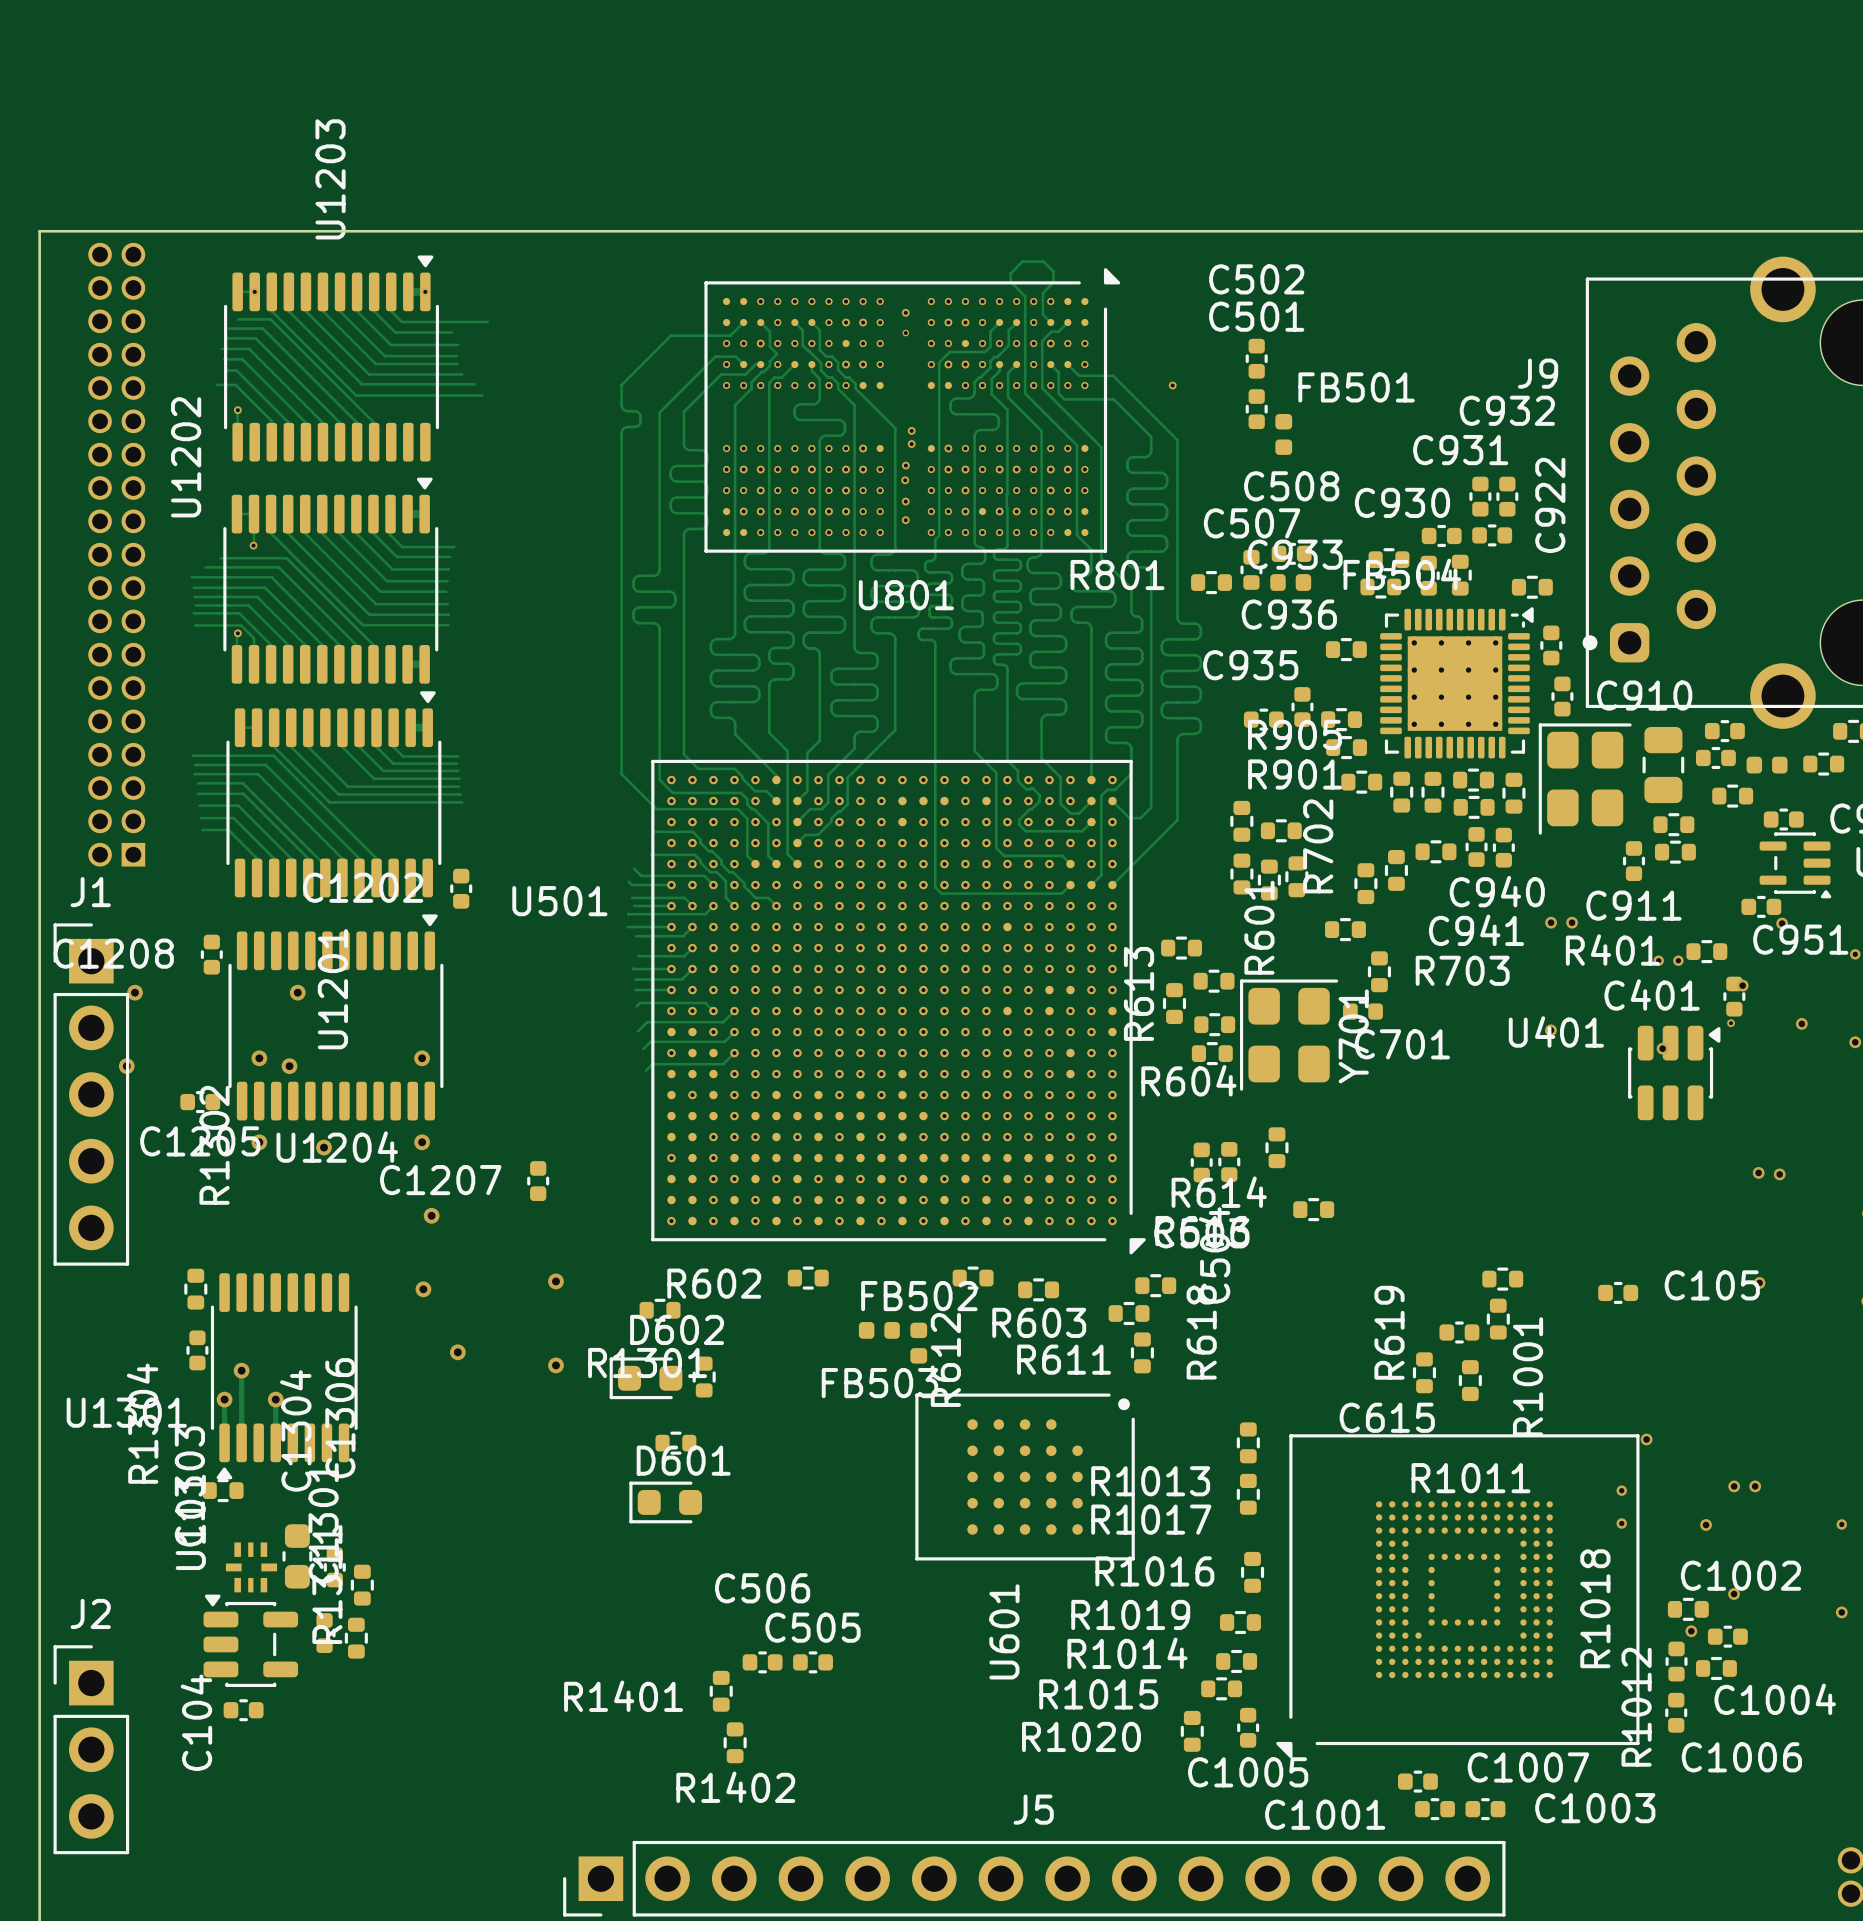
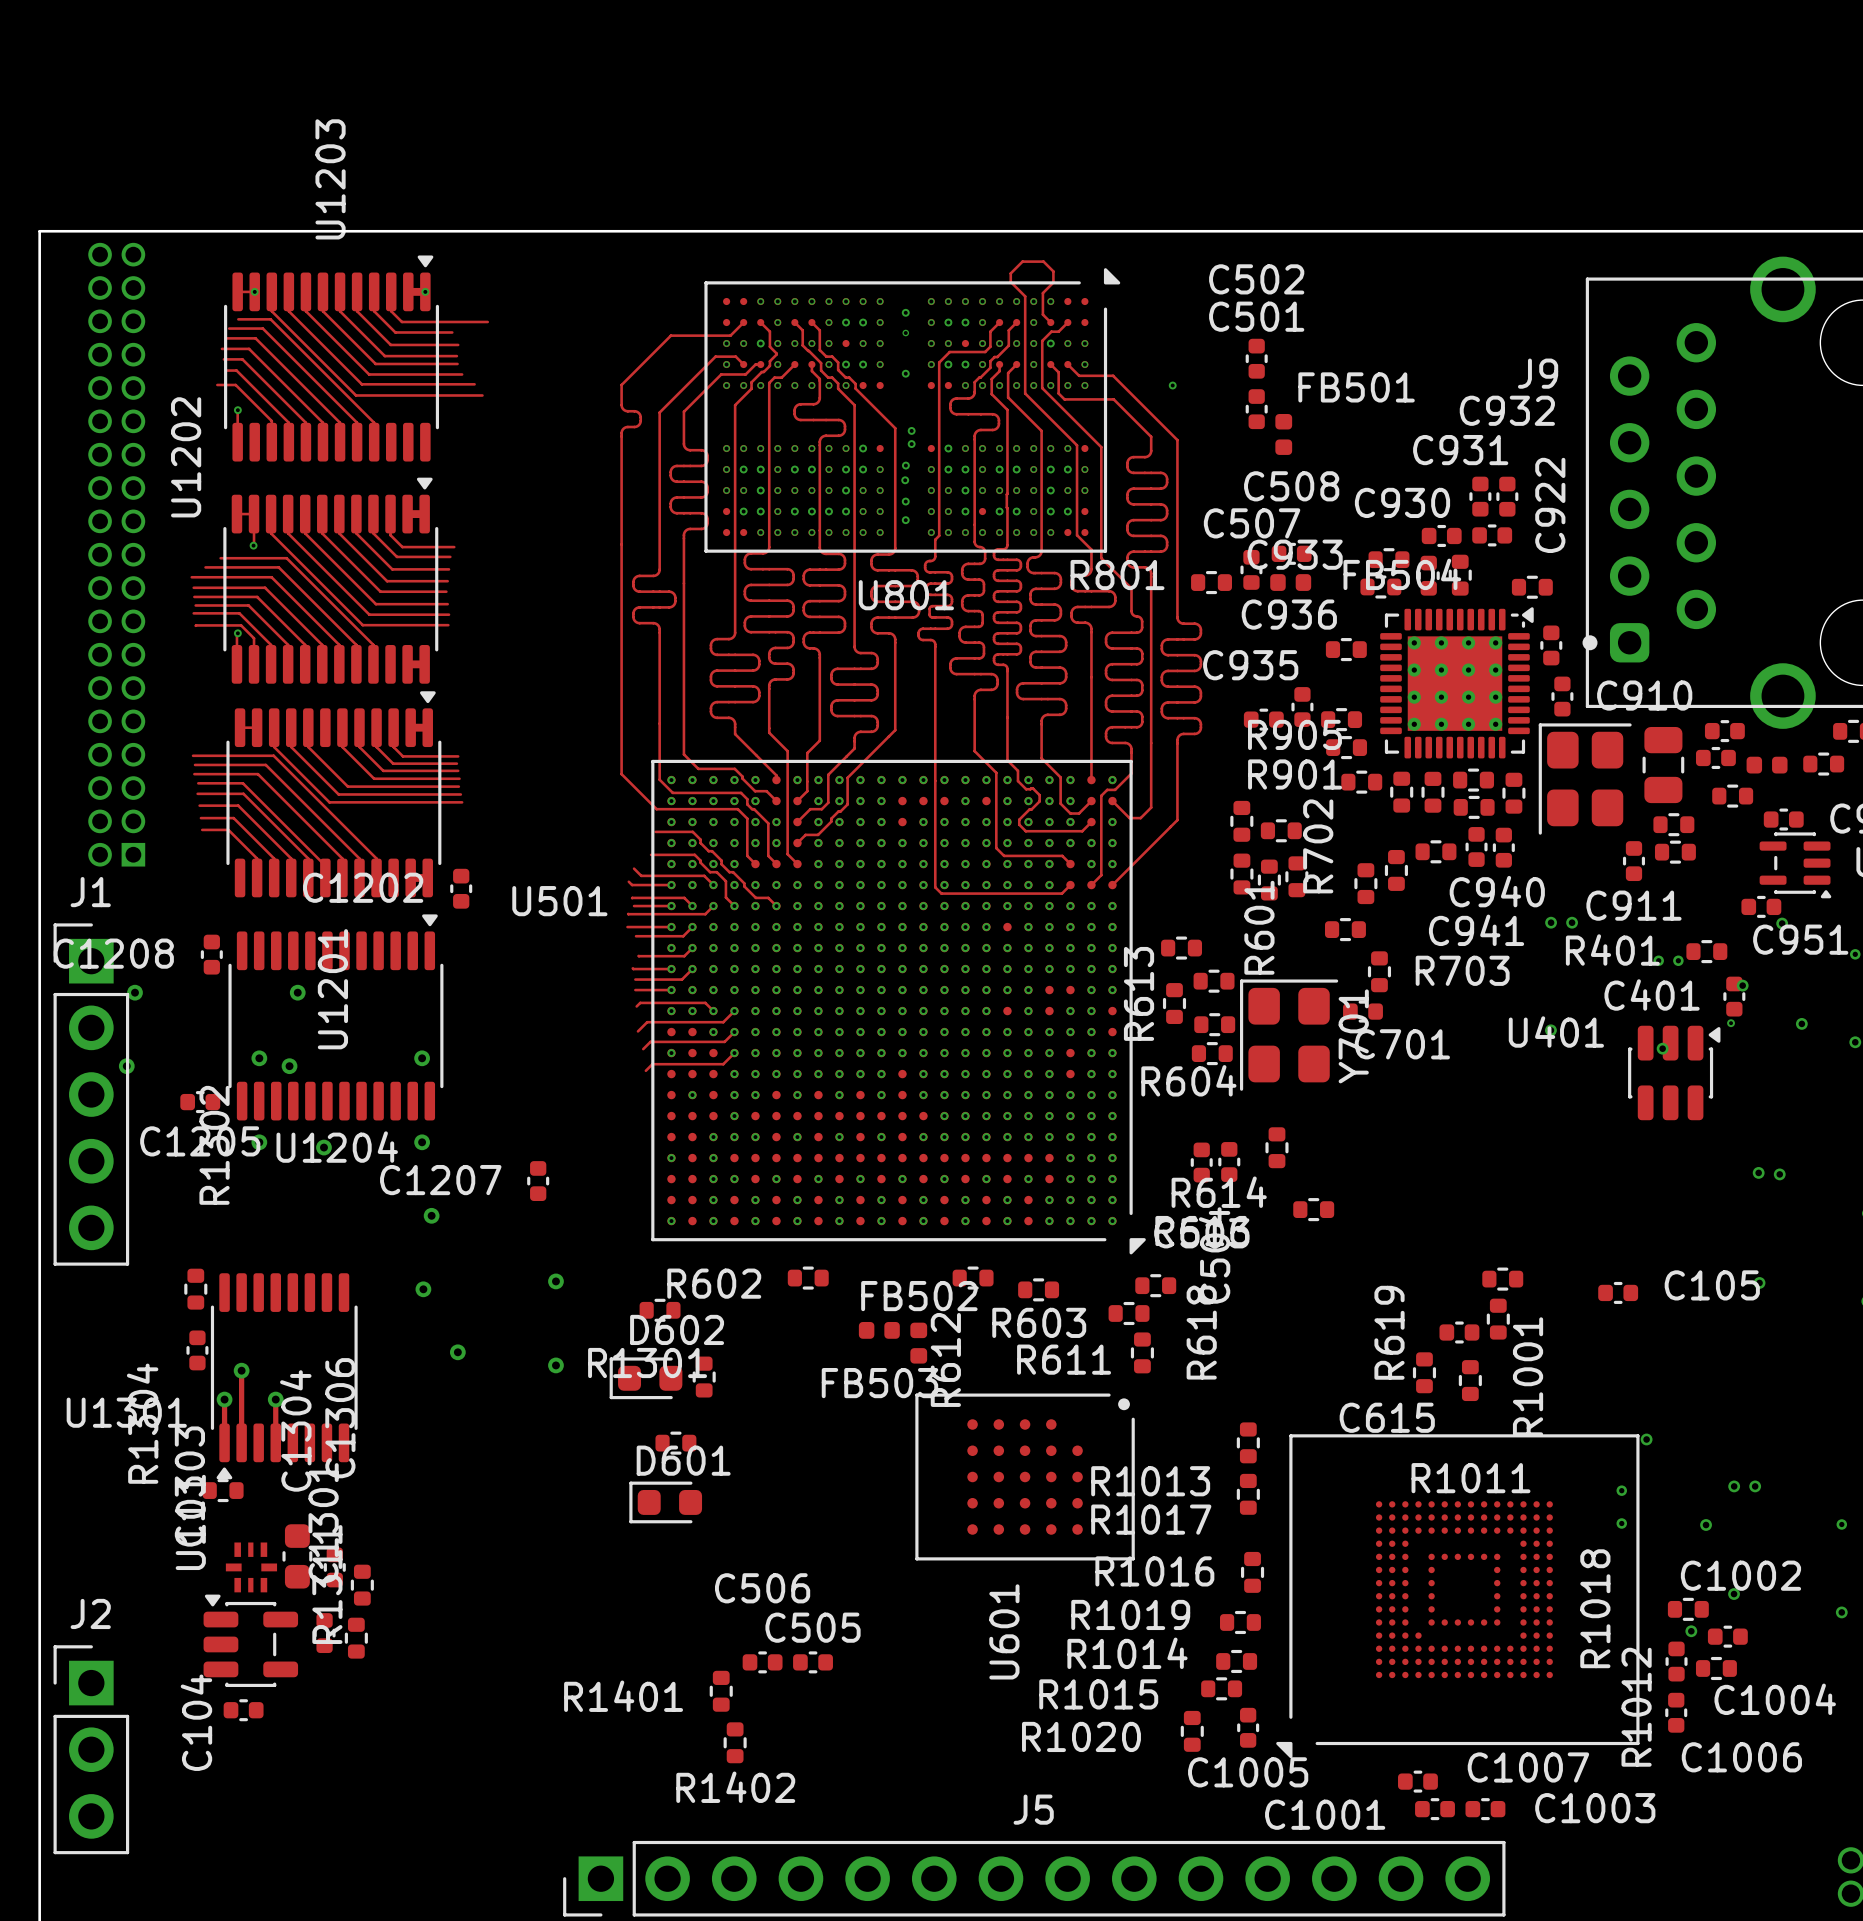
via: none -> (905, 373)

